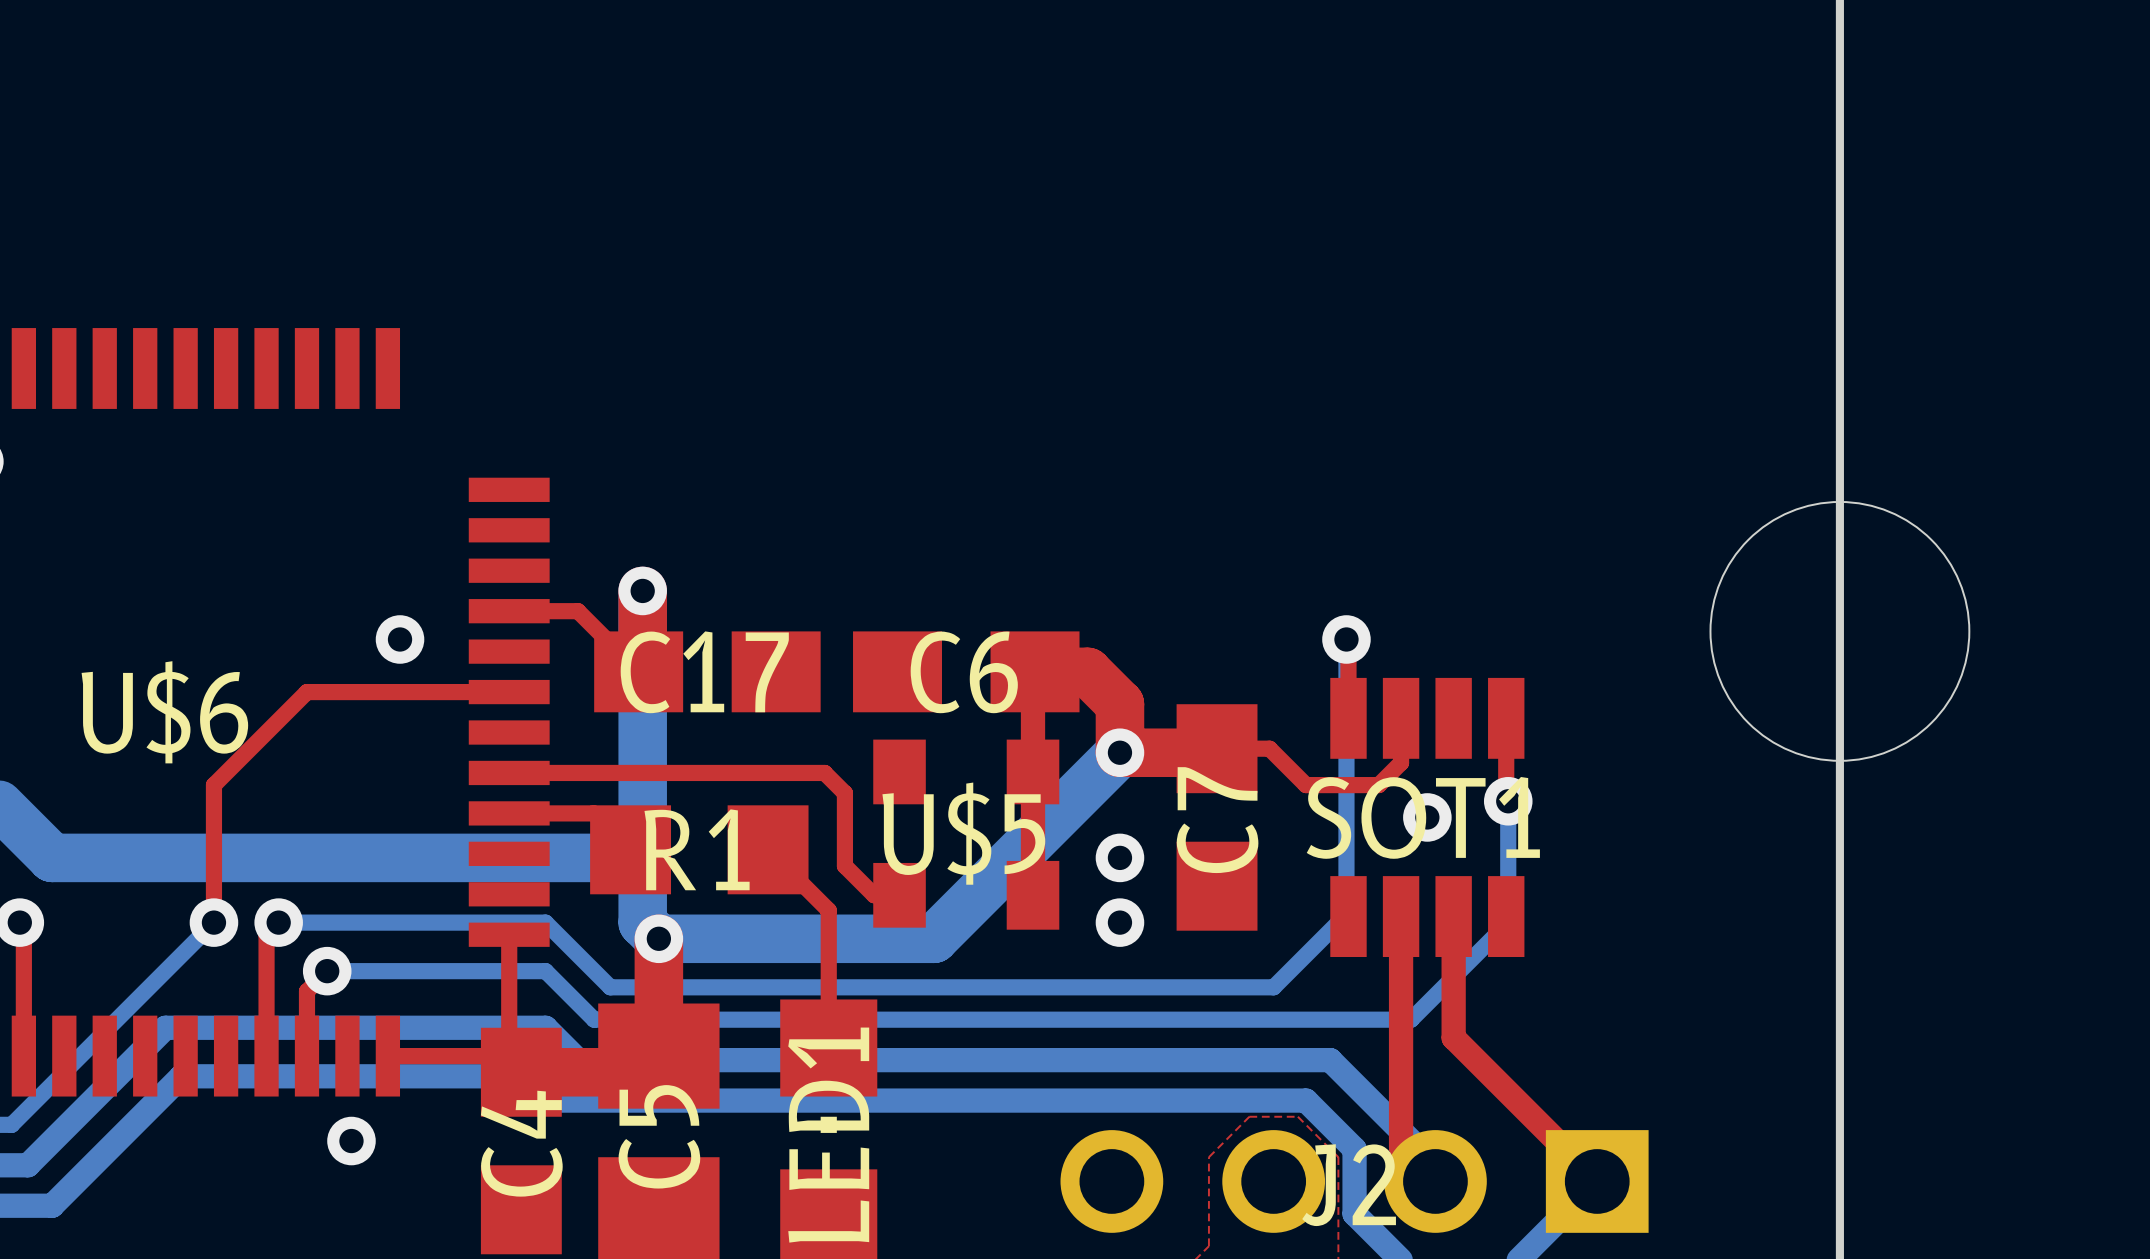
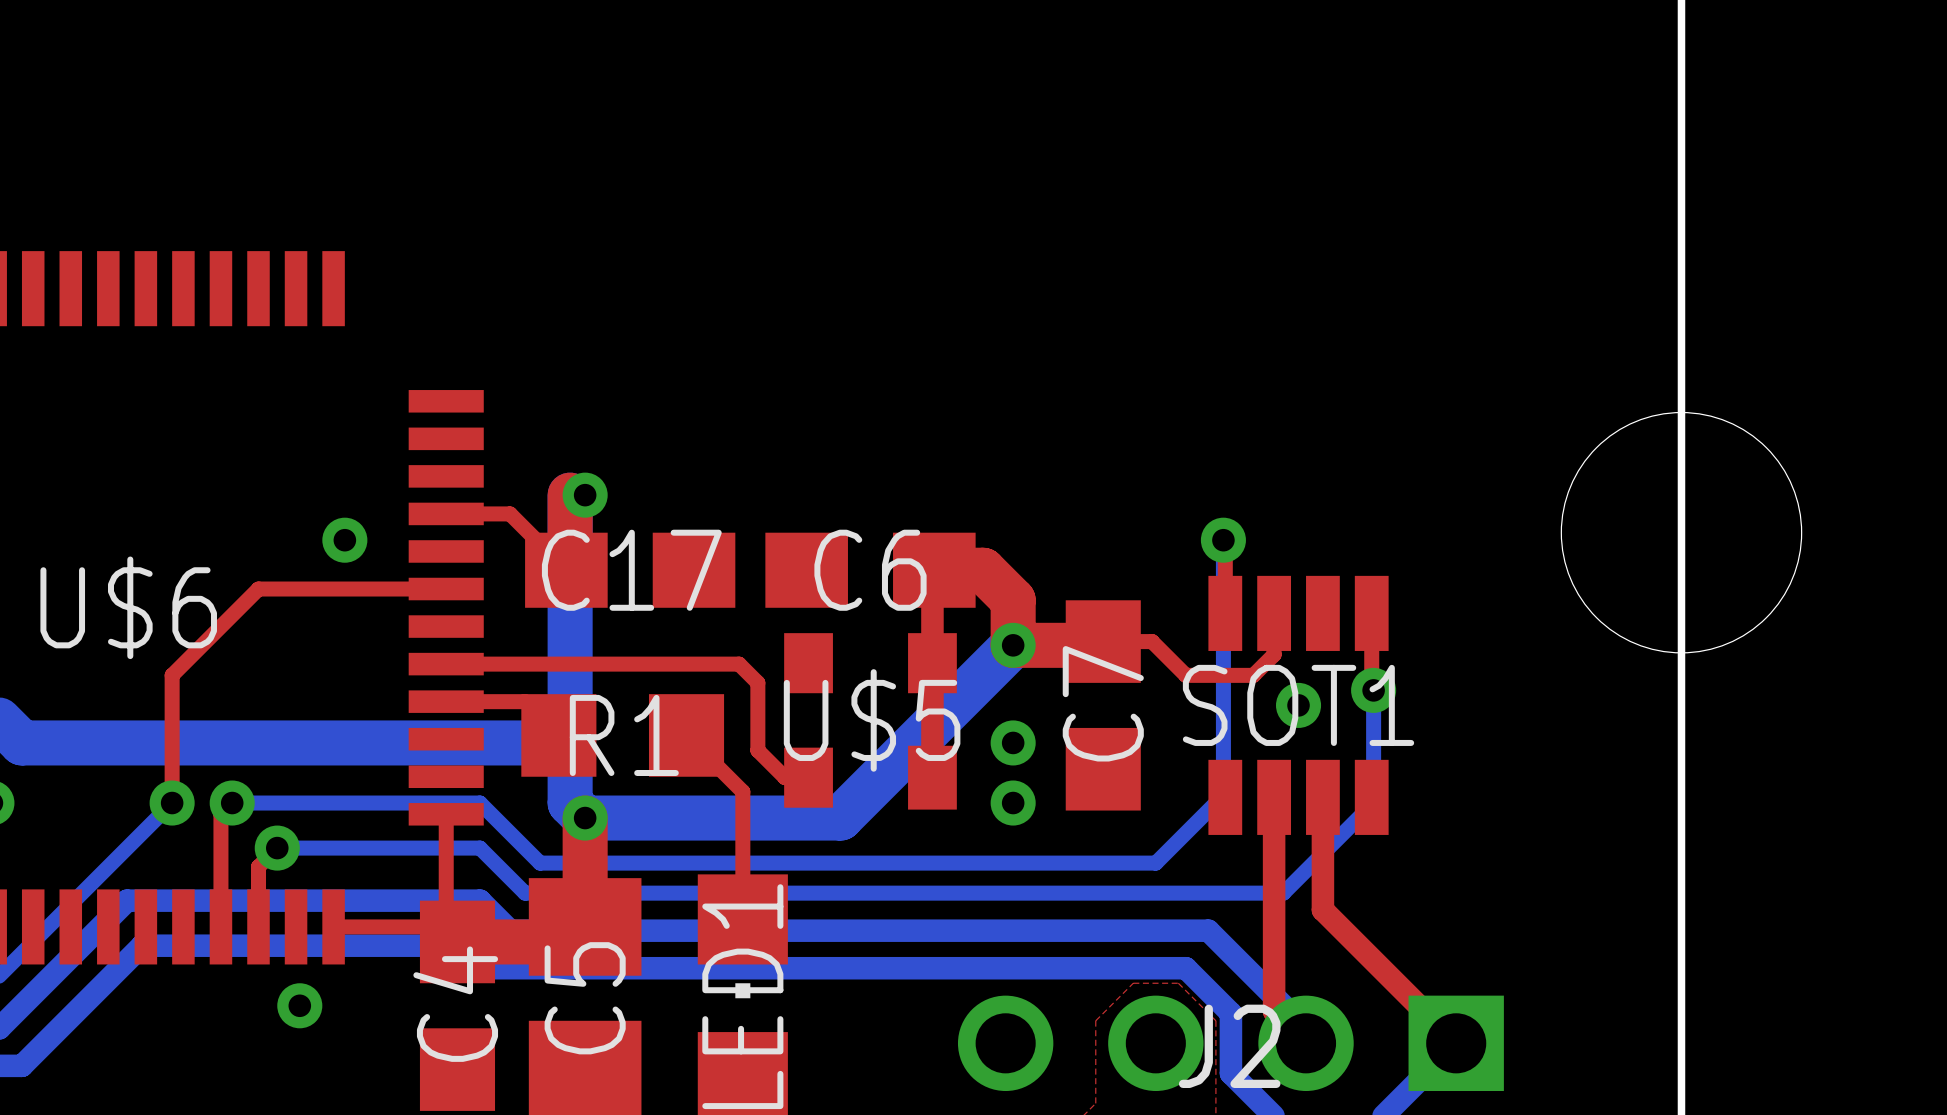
via position: (642, 590) -> (585, 495)

